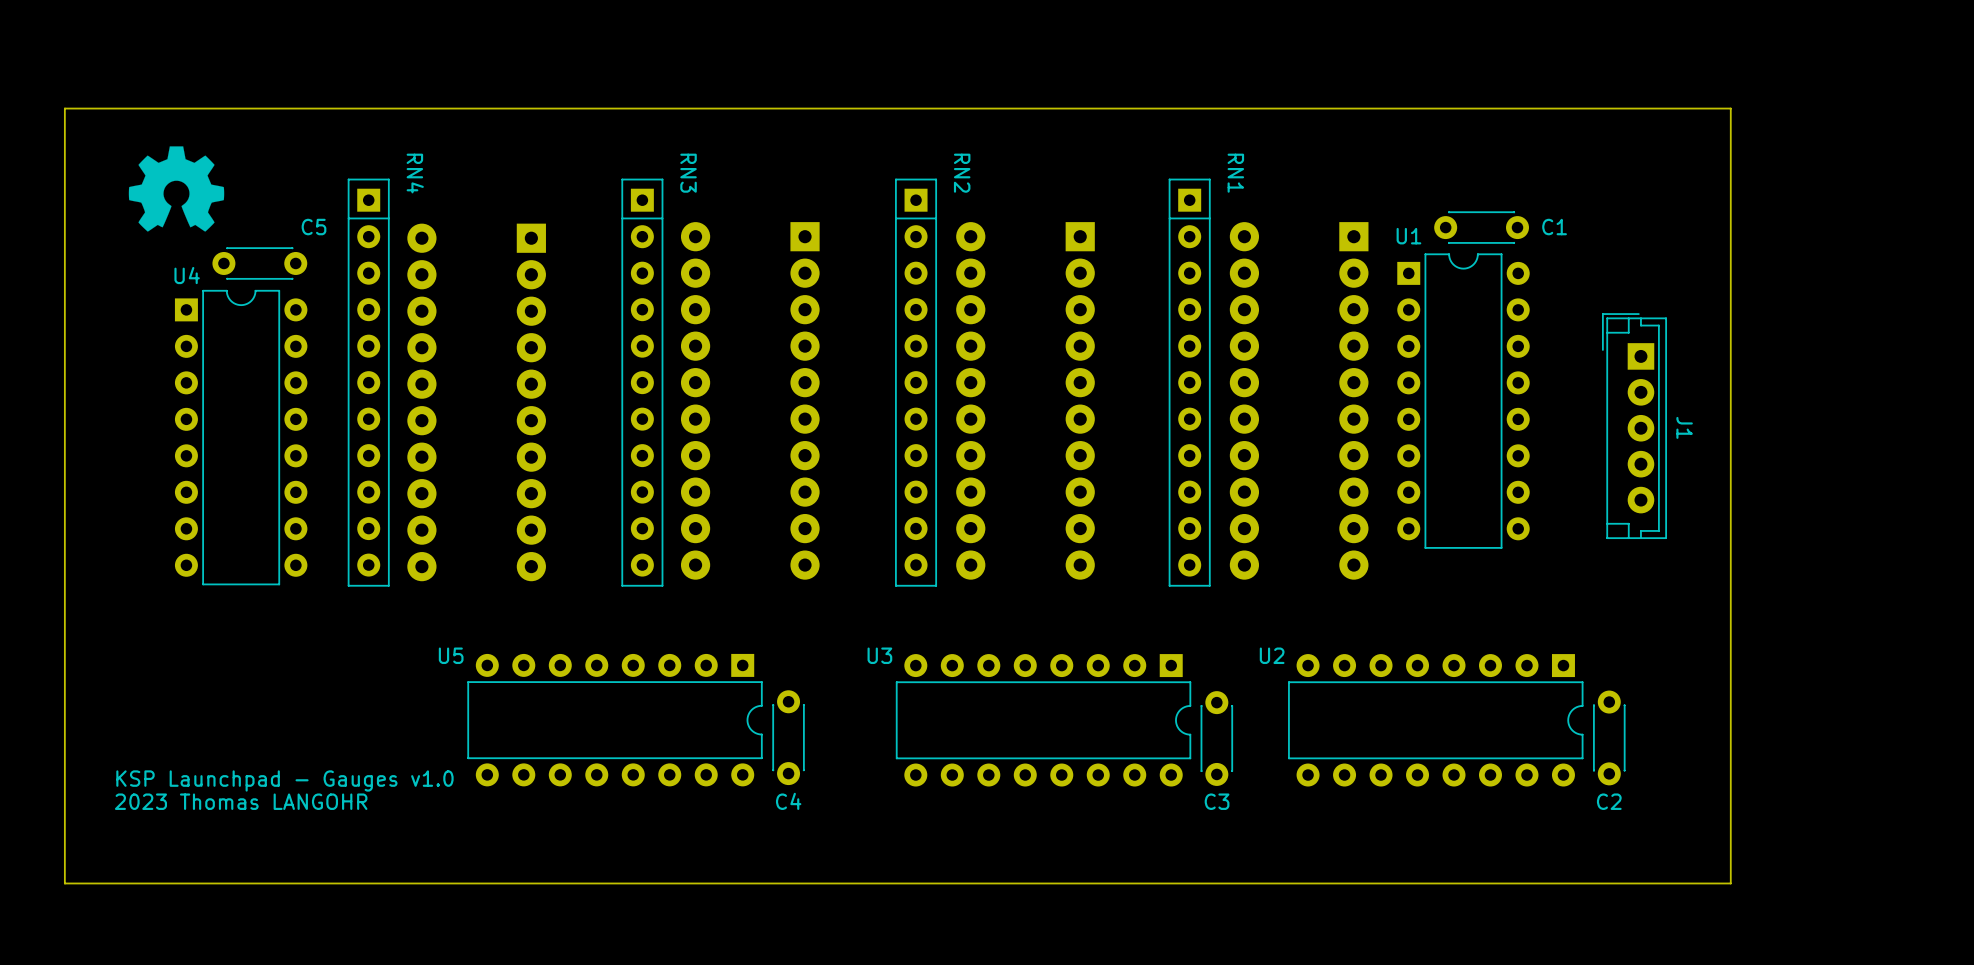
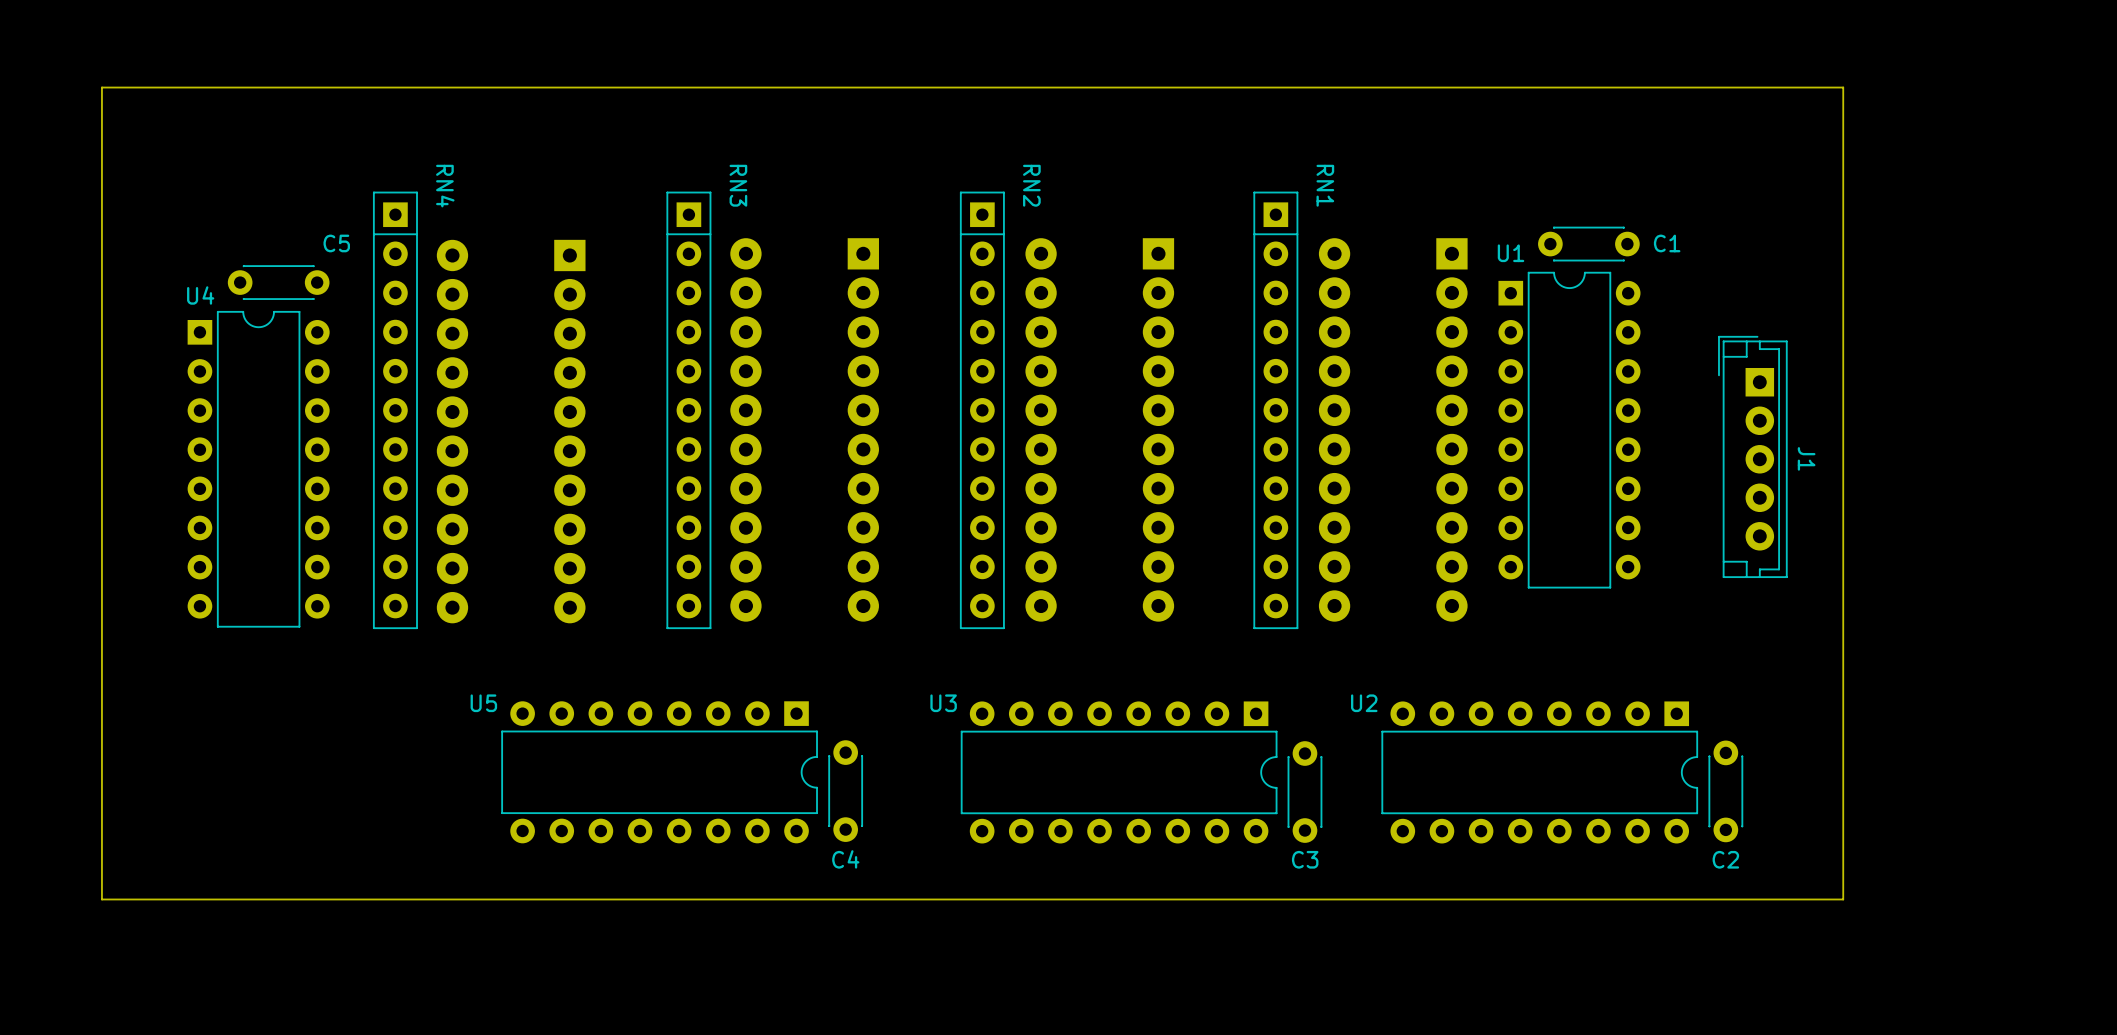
board edge: (1730, 108) (64, 108) (64, 883) (1730, 883) (1730, 108) -> (1843, 87) (1843, 899) (101, 899) (101, 87) (1843, 87)
drawing: [128, 146, 225, 232] -> none
text: KSP Launchpad - Gauges v1.0 (284, 780) -> none
text: 2023 Thomas LANGOHR (241, 801) -> none

